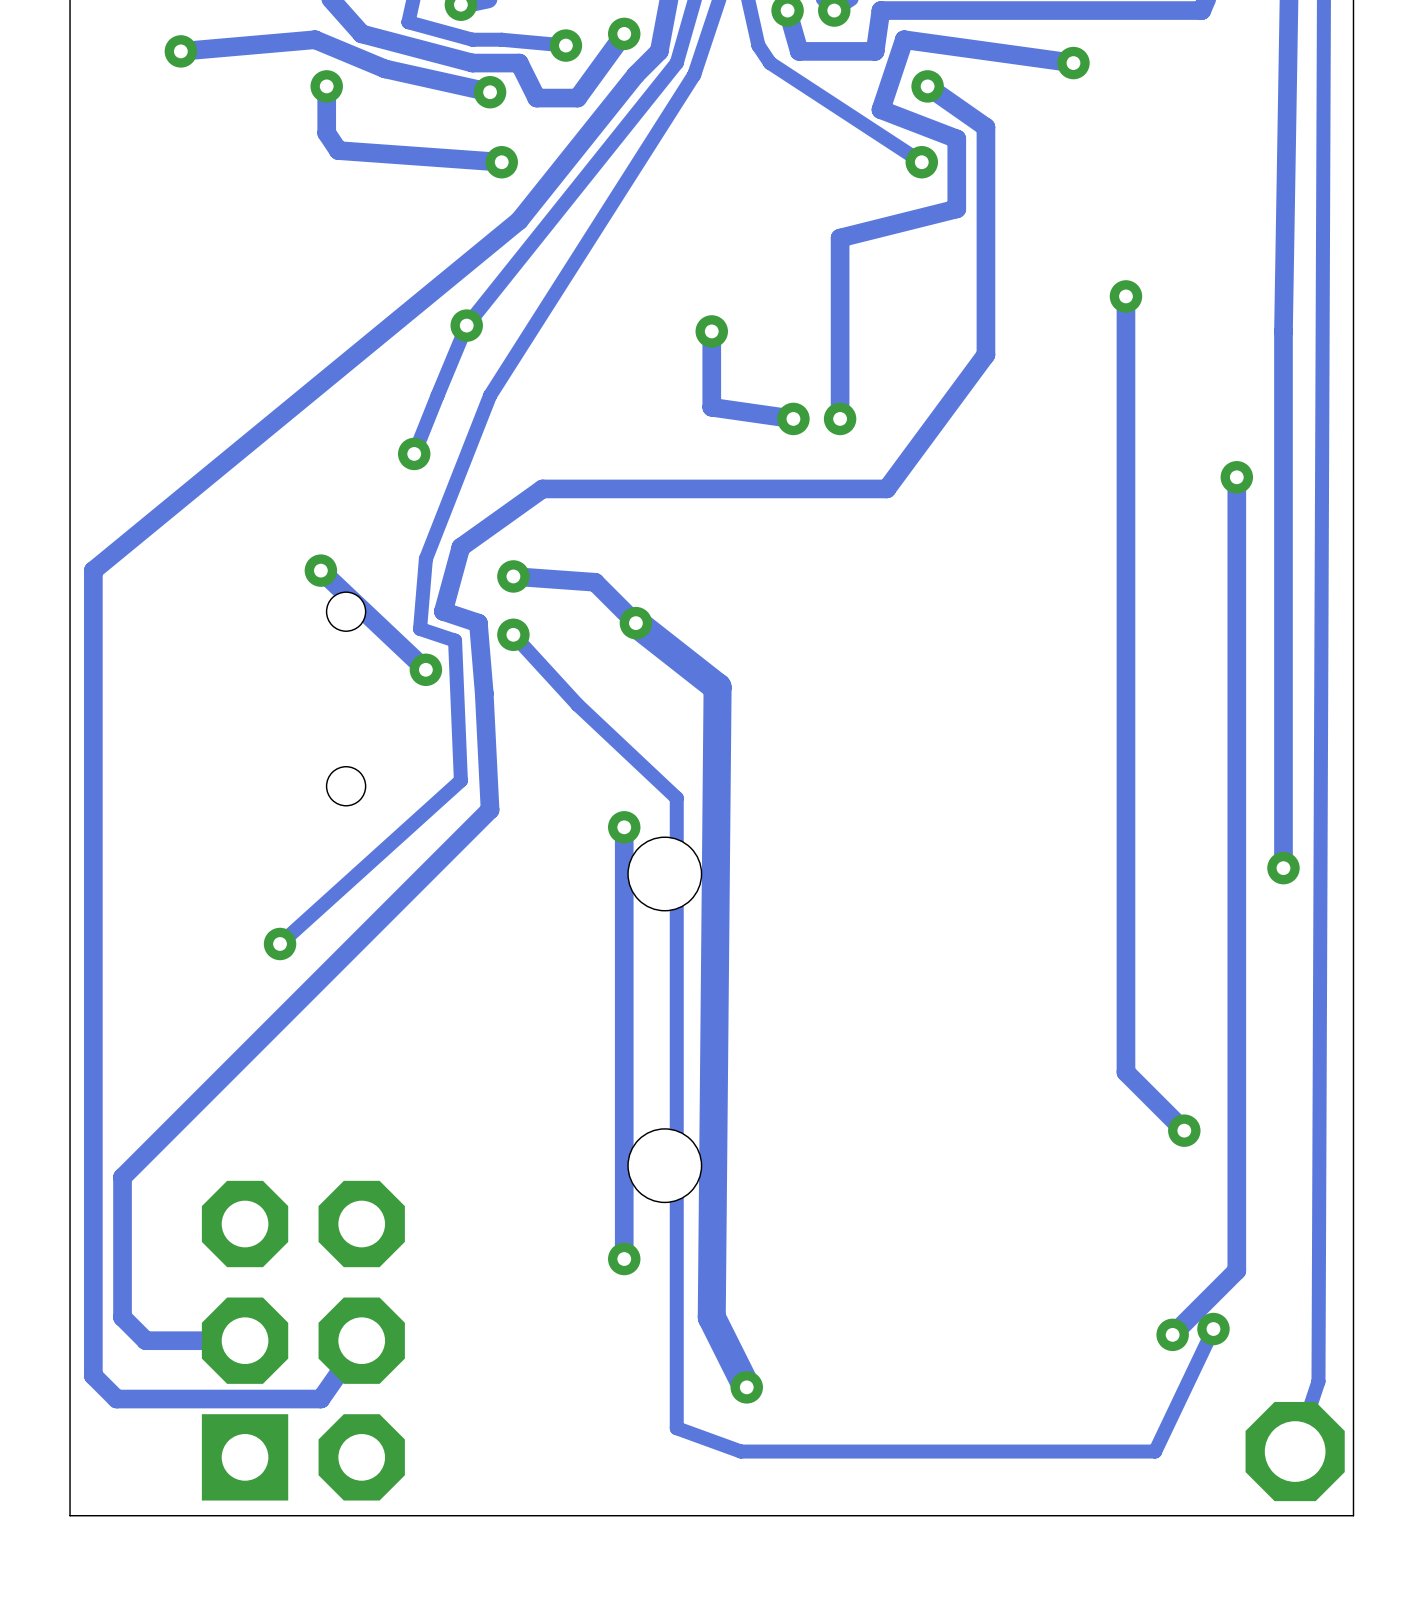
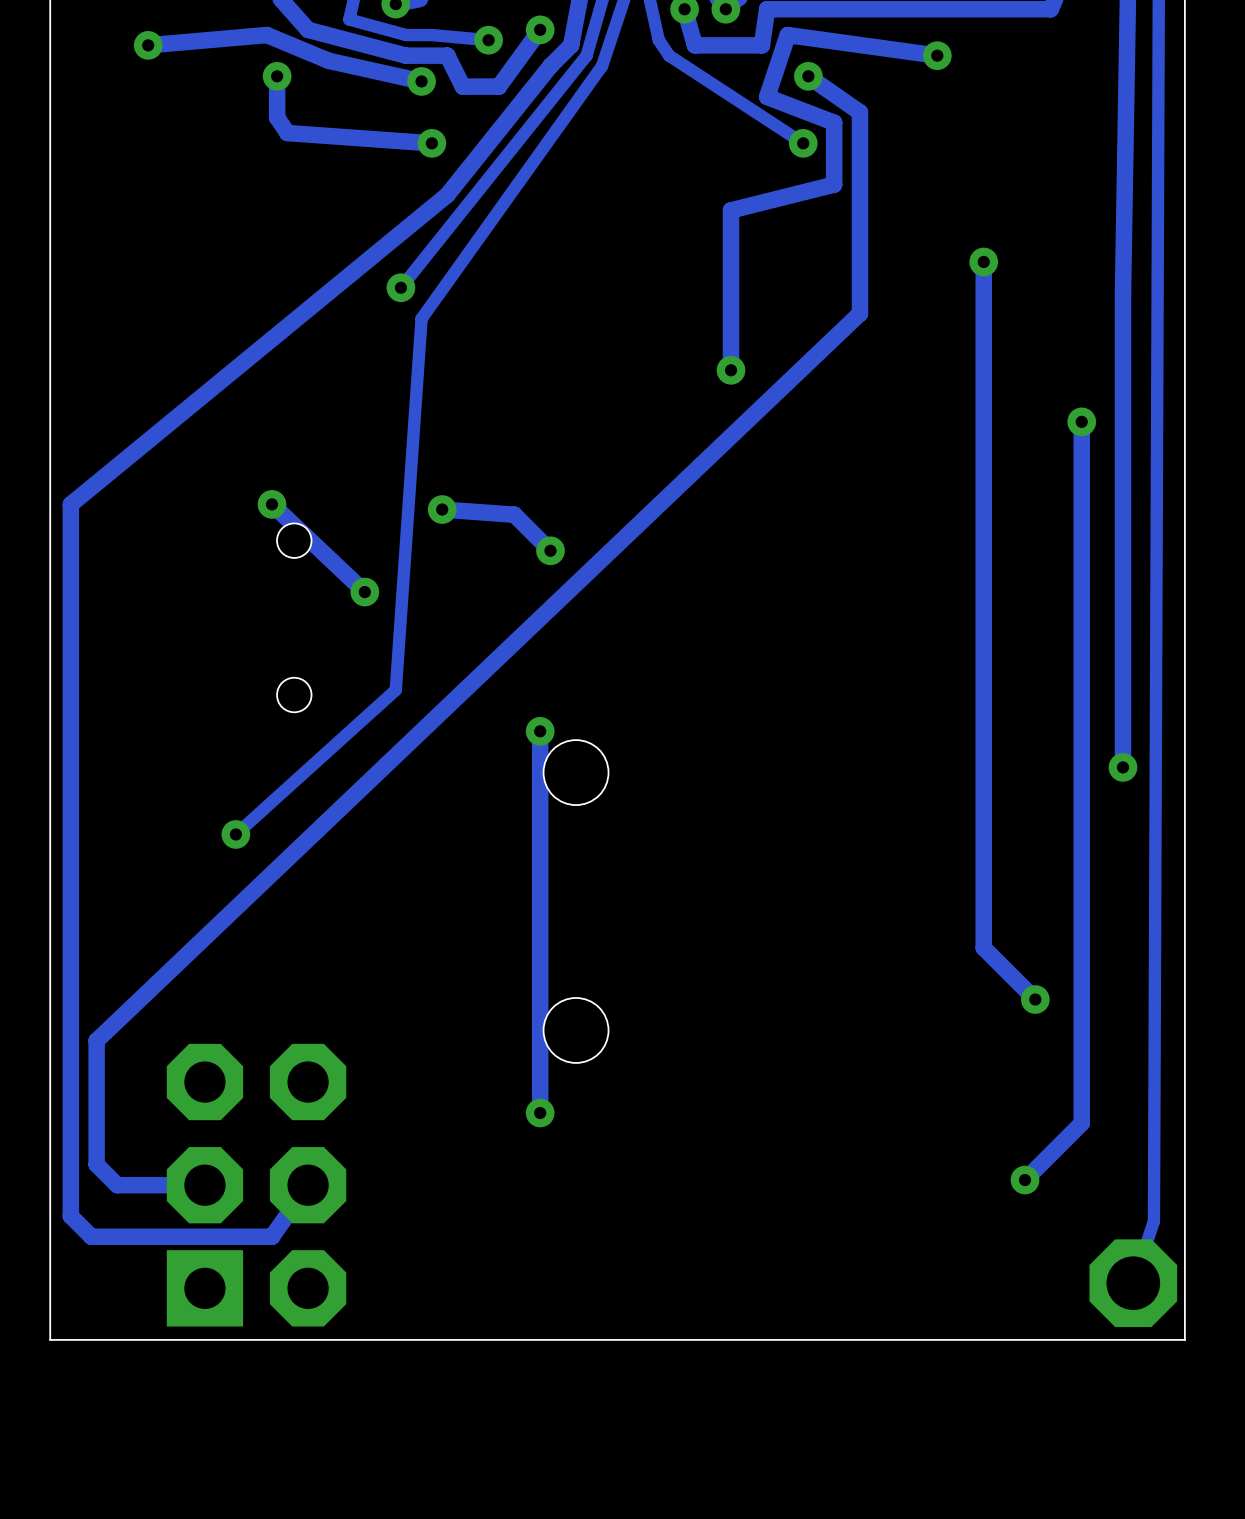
track: (694, 74) (490, 395) (425, 558) (420, 628) (455, 640) (460, 780) -> (602, 65) (421, 318) (395, 690)
track: (466, 325) (414, 453) -> none
track: (711, 331) (711, 407) (793, 418) -> none
via: (711, 331) -> none
track: (985, 354) (886, 488) (542, 488) (460, 547) (443, 611) (478, 623) (490, 809) (122, 1177) -> (859, 313) (96, 1040)
via: (793, 418) -> none
via: (414, 453) -> none
track: (635, 623) (717, 687) (711, 1317) (746, 1387) -> none
track: (513, 634) (577, 704) (676, 798) (676, 1428) (740, 1451) (1155, 1451) (1213, 1329) -> none
via: (513, 634) -> none
via: (1213, 1329) -> none
via: (746, 1387) -> none

